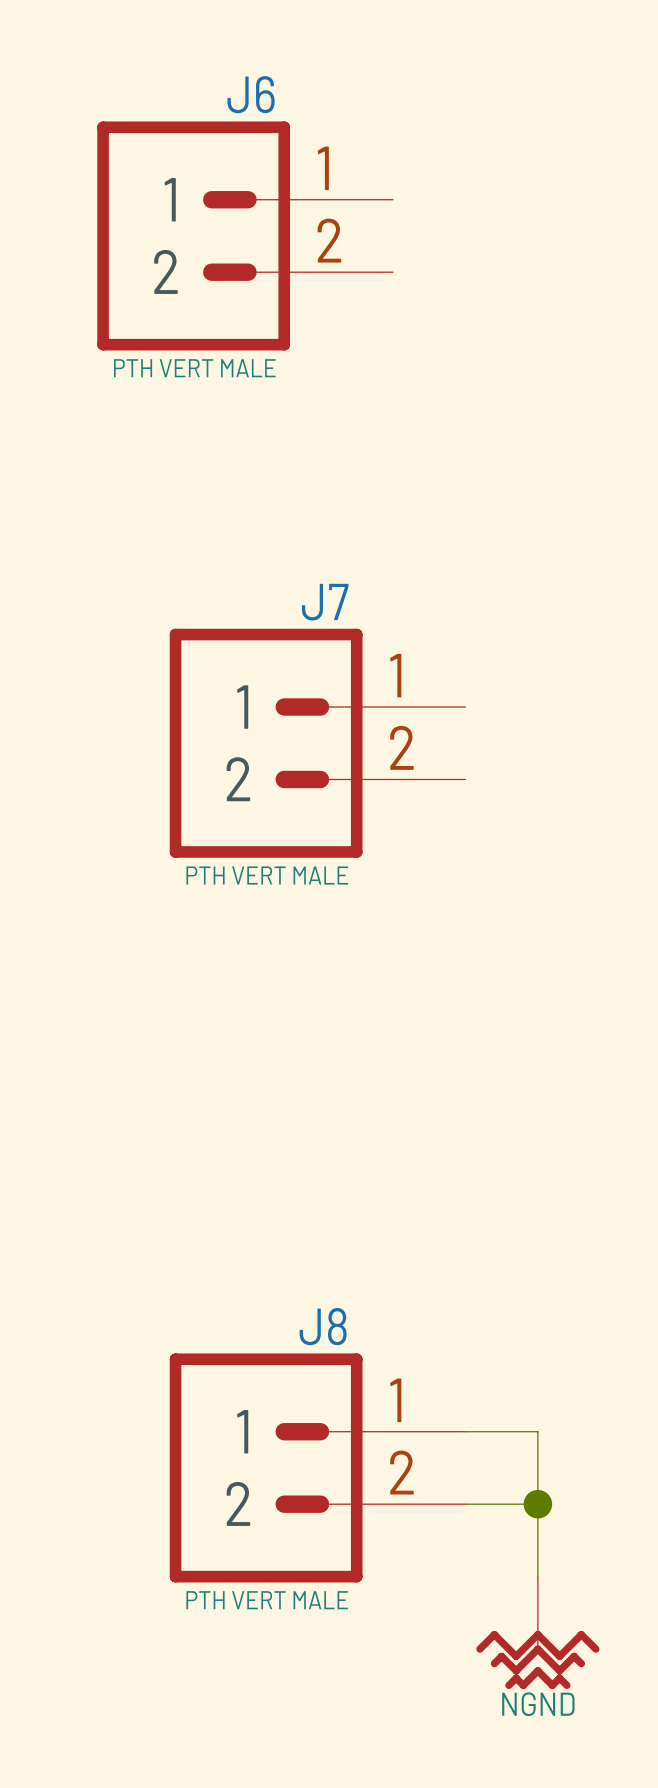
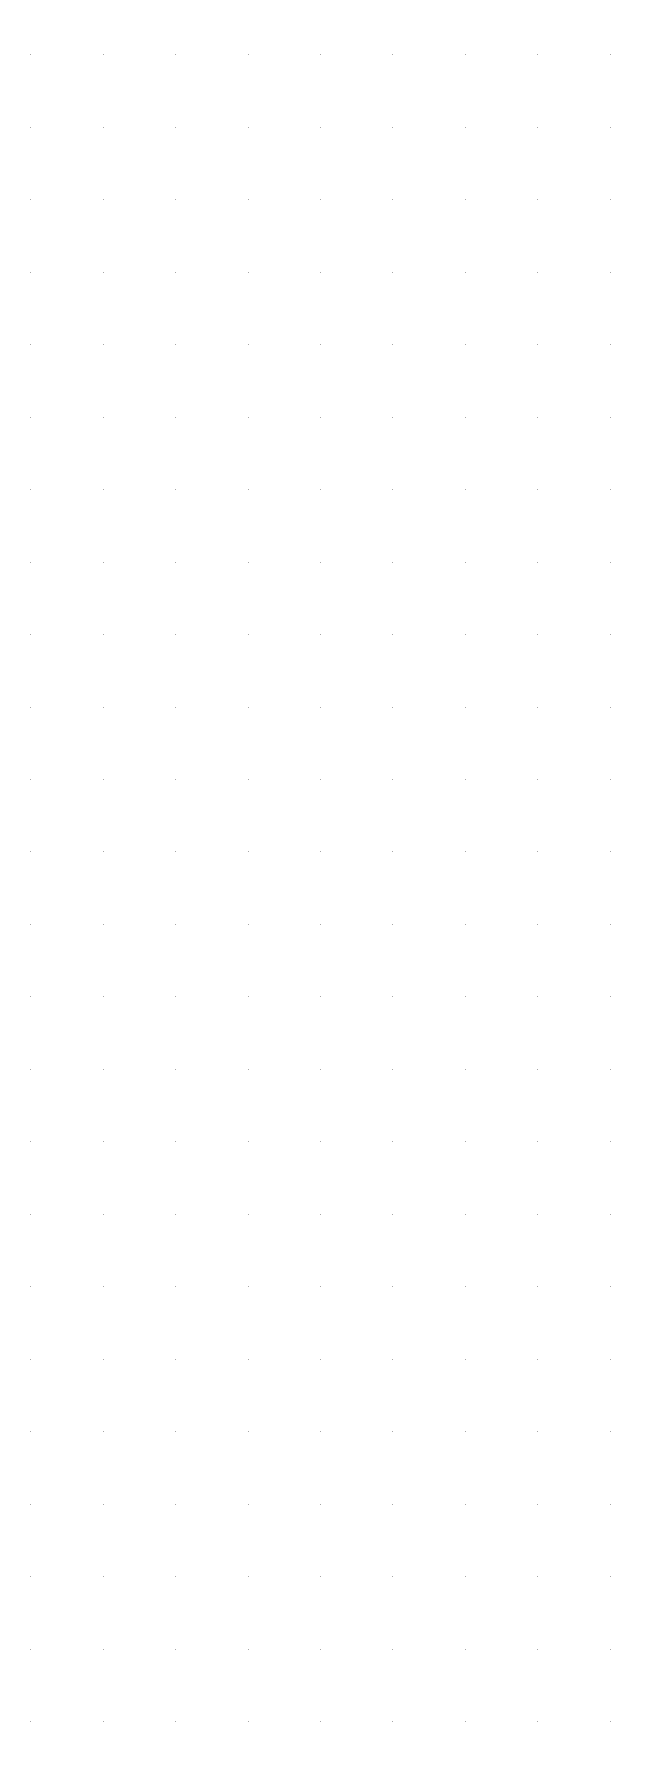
J6: PTH VERT MALE (245, 235) -> none
J7: PTH VERT MALE (317, 743) -> none
wire: (465, 1431) (537, 1431) (537, 1576) -> none
J8: PTH VERT MALE (317, 1467) -> none
wire: (465, 1504) (537, 1504) -> none
junction: (537, 1504) -> none
power symbol: (537, 1632) -> none

